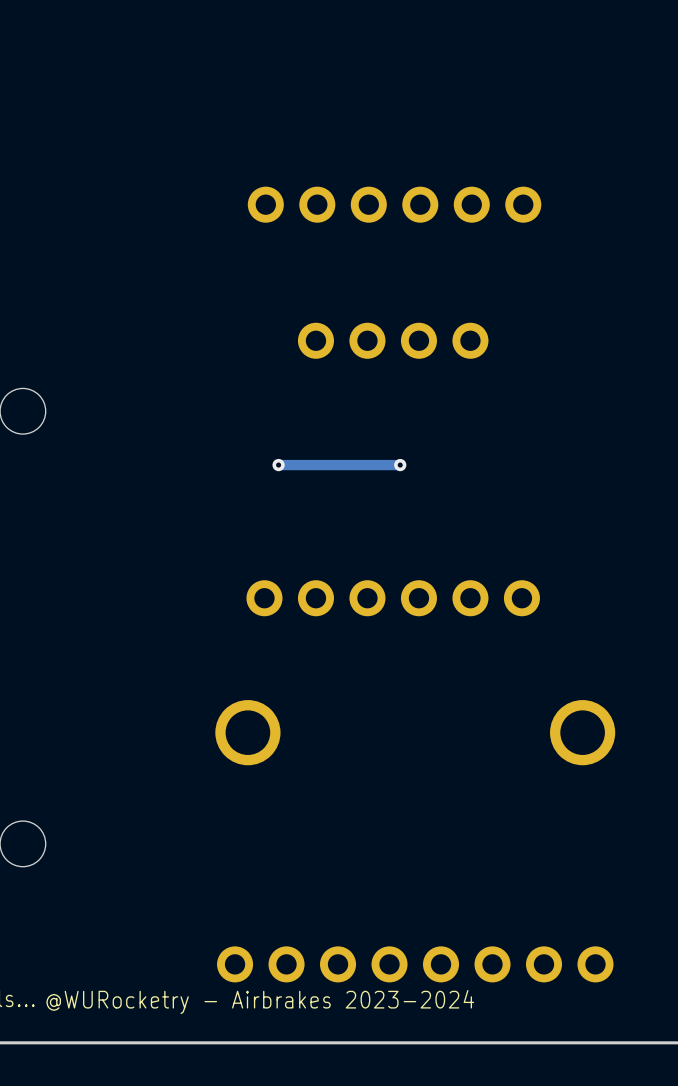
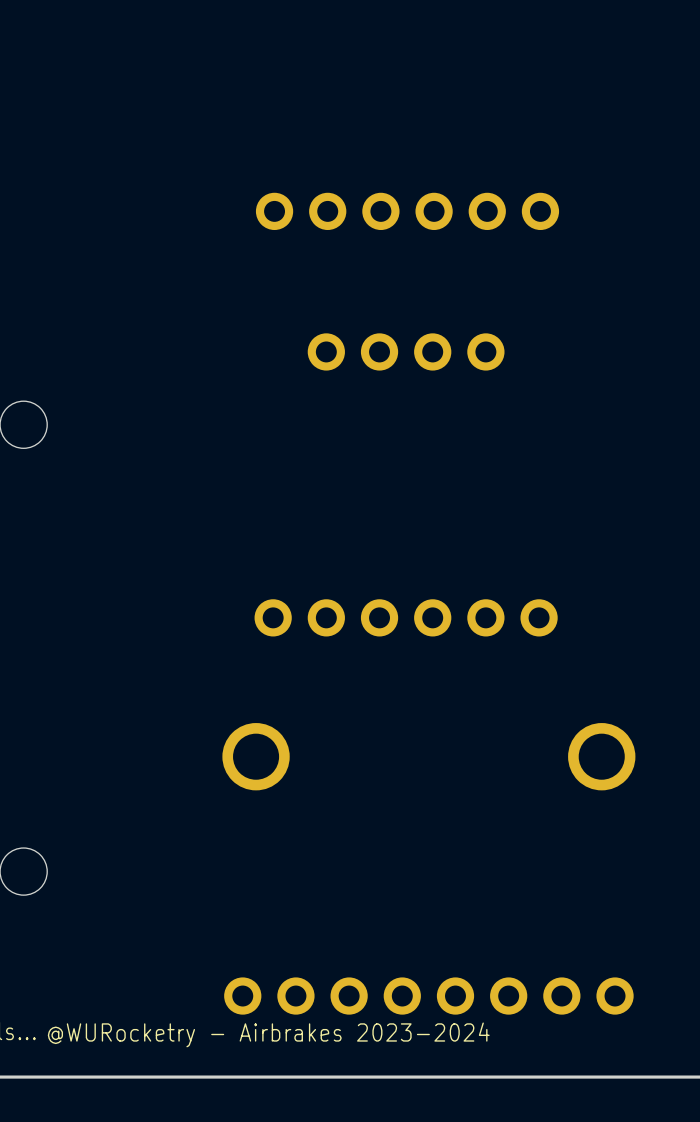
via: (278, 465) -> none
track: (400, 465) (278, 465) -> none
via: (400, 465) -> none

